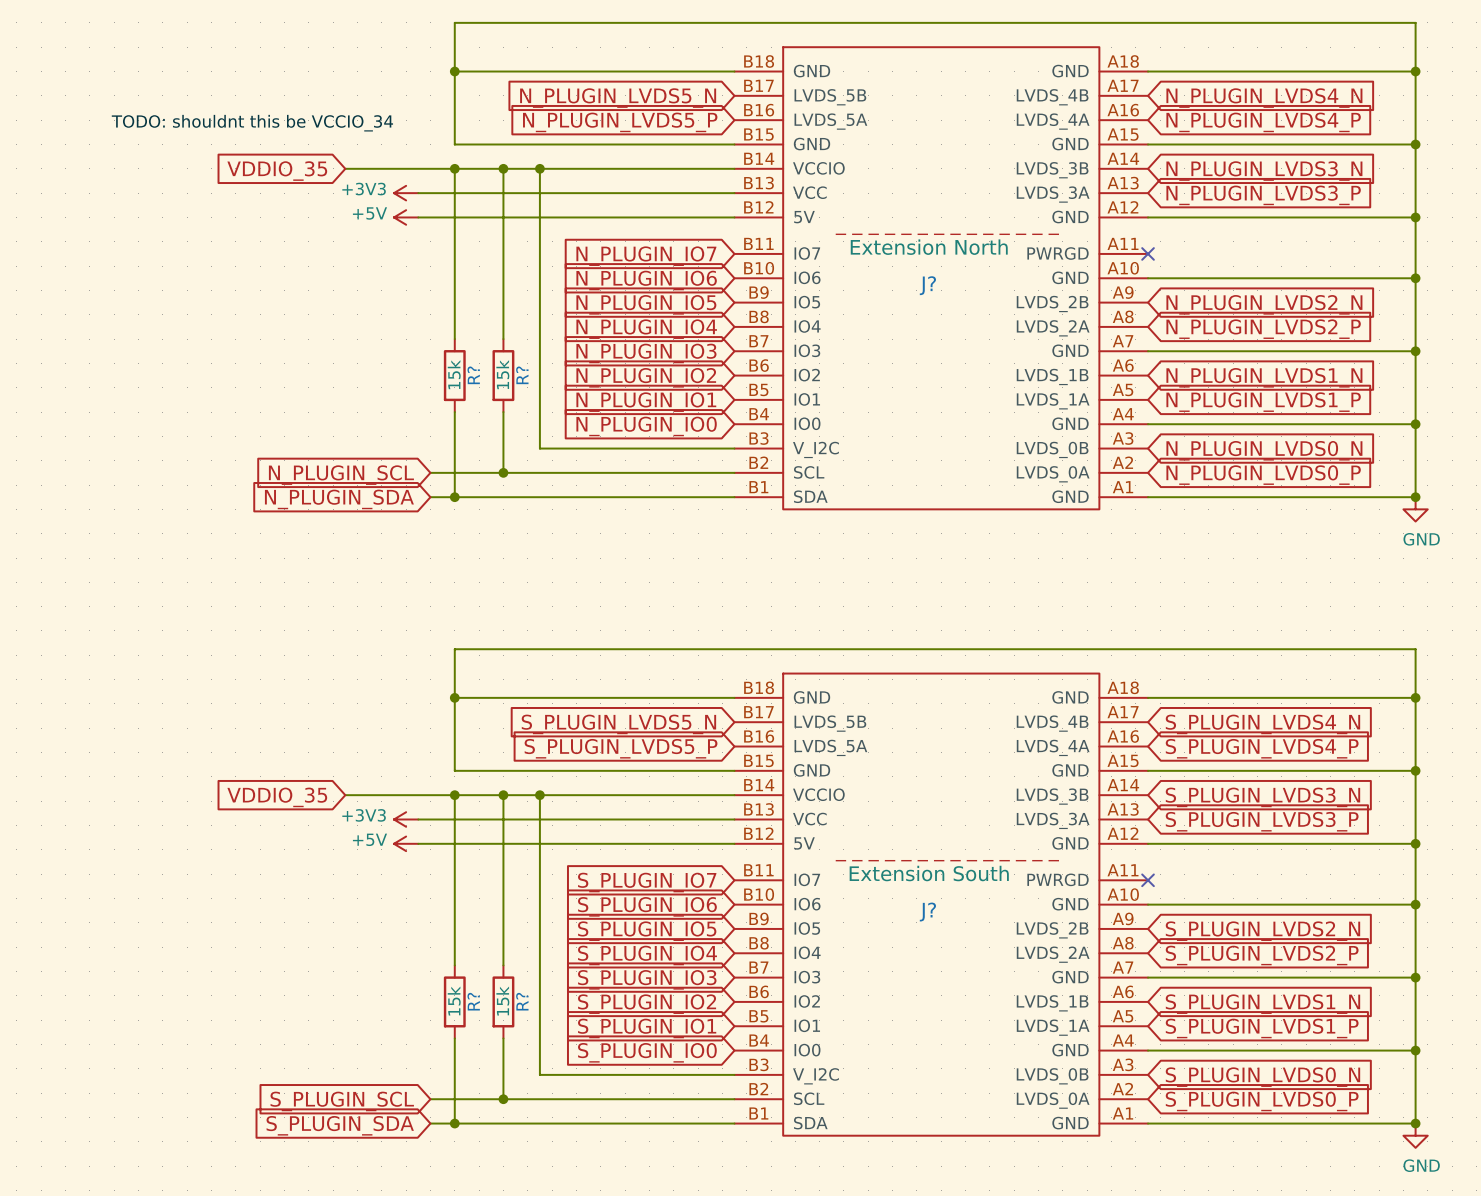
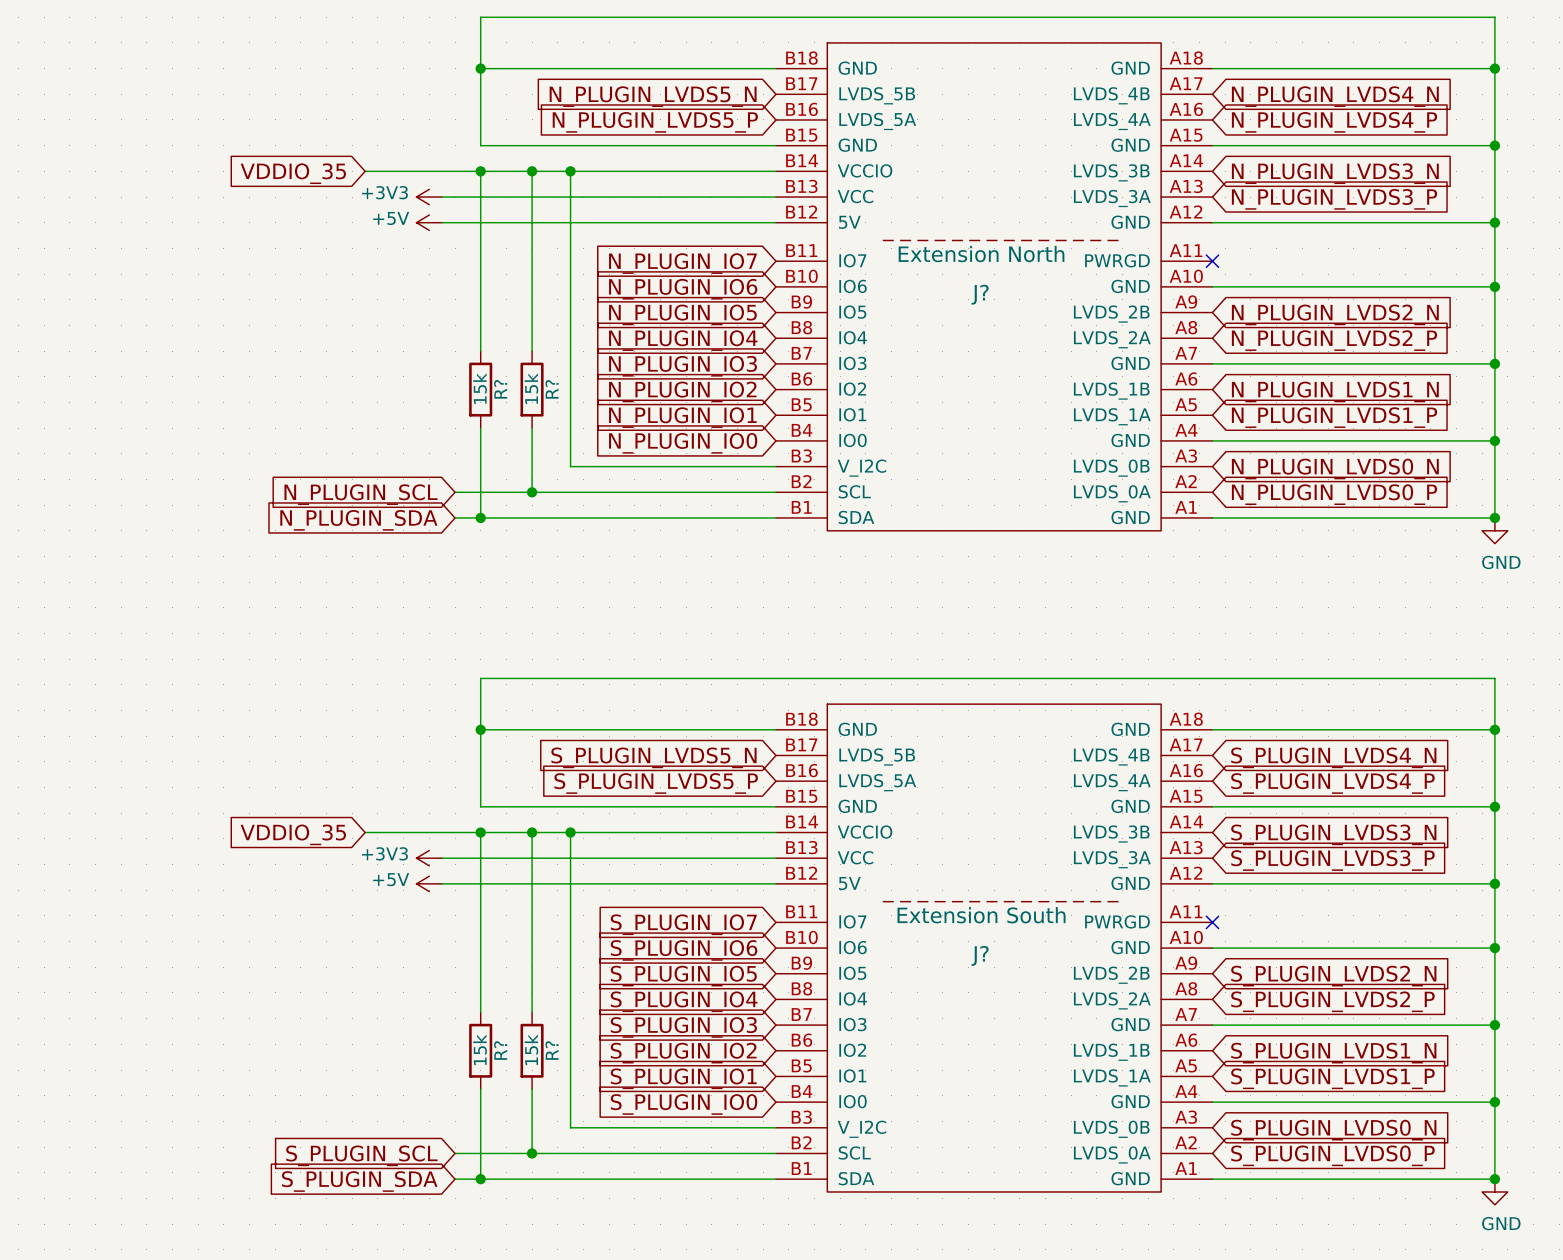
label: TODO: shouldnt this be VCCIO_34 (252, 123) -> none

